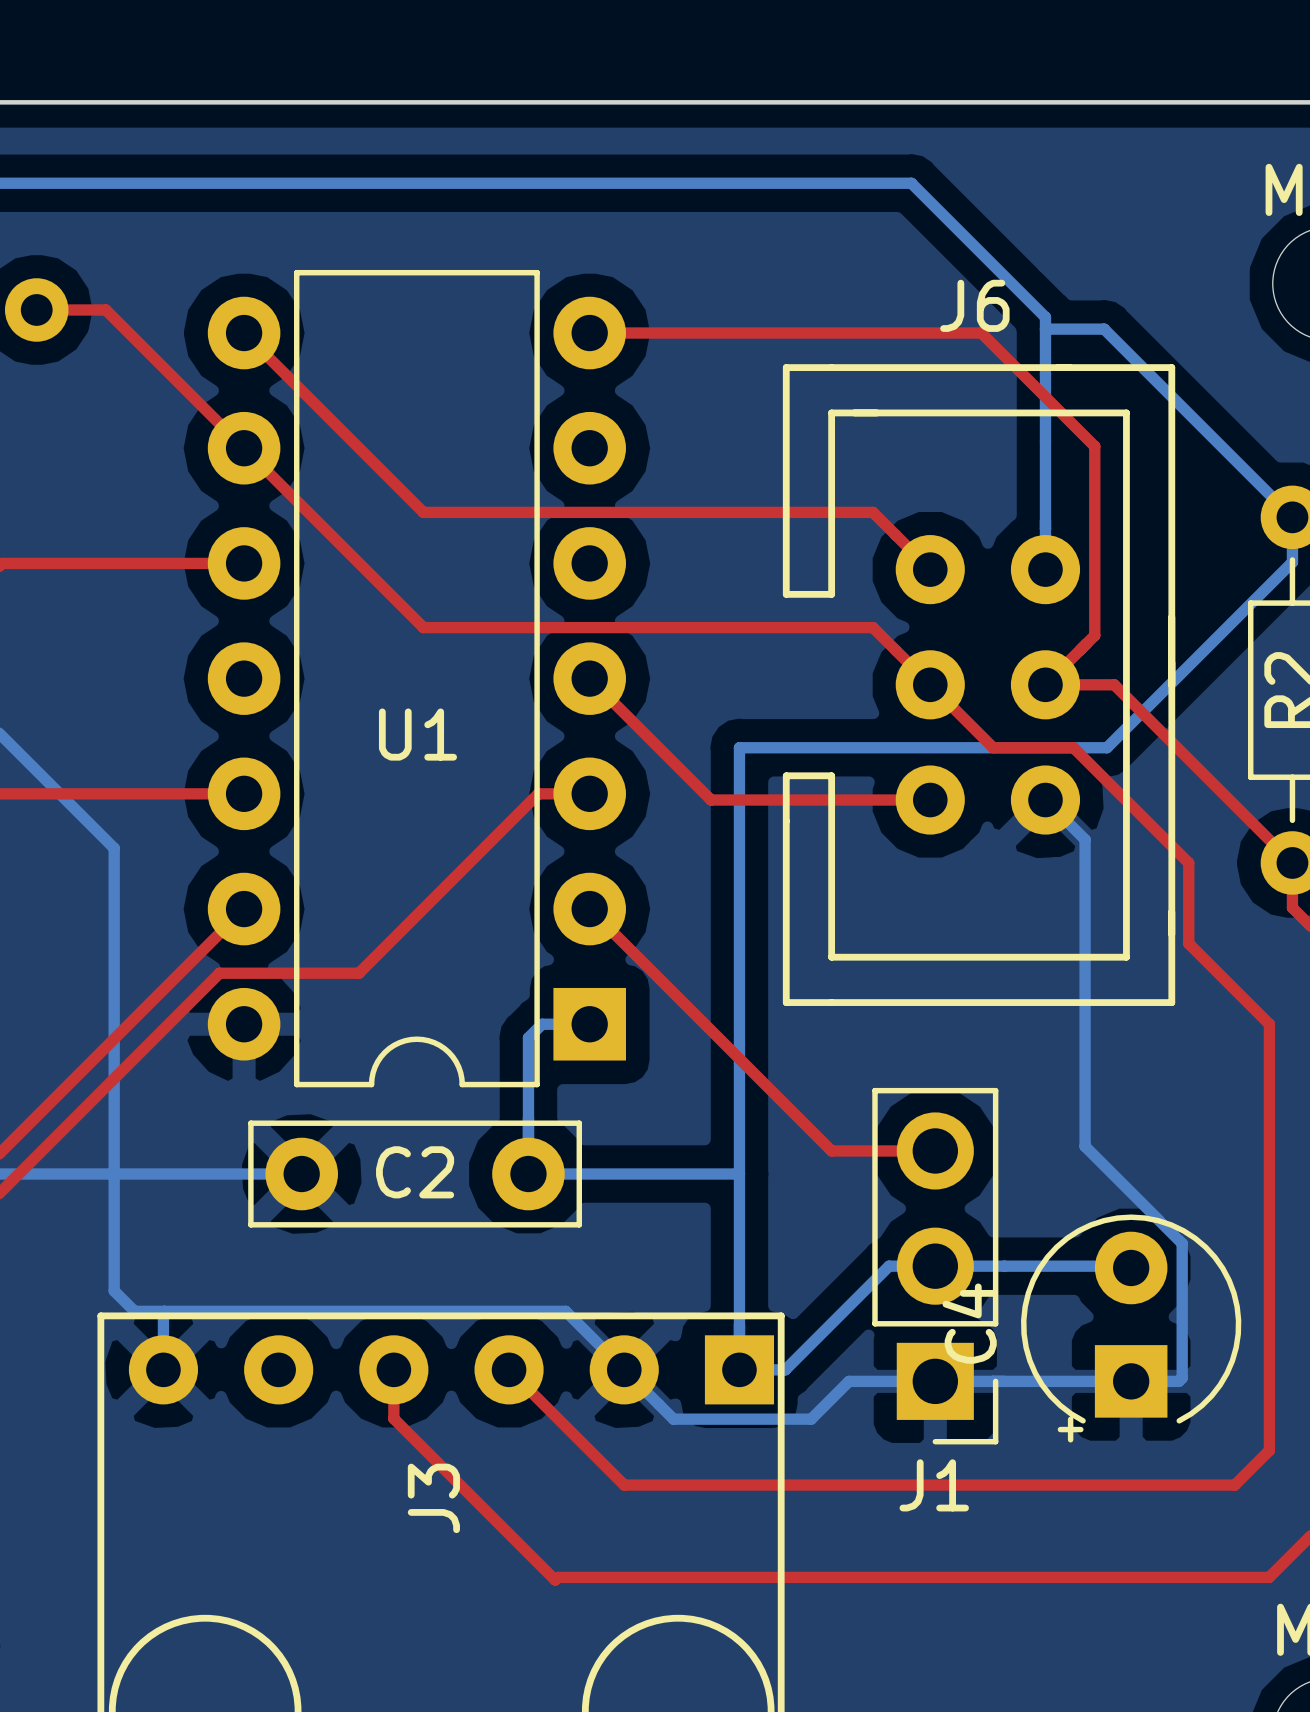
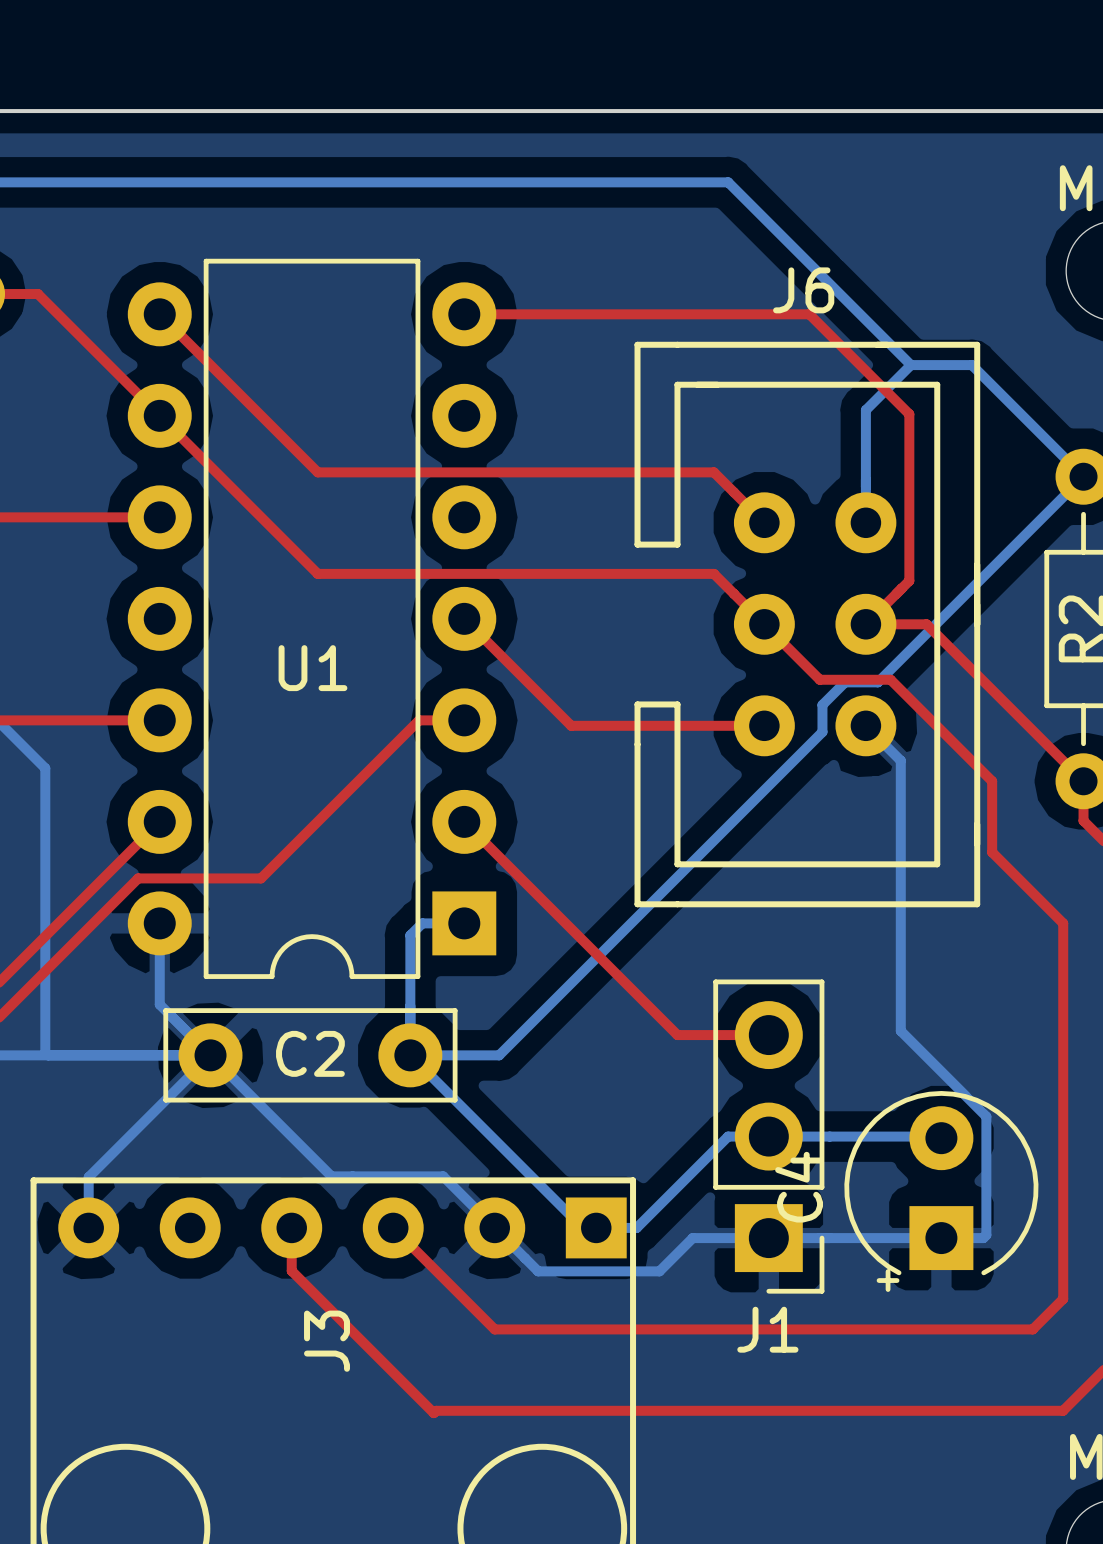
bottom track: (889, 183) (911, 183) (1045, 317) (1045, 441) -> (728, 182) (910, 365)
bottom track: (1045, 329) (1104, 329) (1165, 390) -> (910, 365) (971, 365)
bottom track: none -> (910, 365) (865, 410)
bottom track: (1292, 517) (1292, 562) (1106, 747) (739, 747) (739, 1369) -> (1083, 476) (877, 682) (845, 682) (822, 704) (822, 732) (499, 1055)
bottom track: (114, 1170) (114, 1290) (134, 1311) (439, 1311) -> (159, 923) (159, 1004) (331, 1176)
bottom track: none -> (210, 1055) (89, 1176)
bottom track: none -> (410, 1055) (582, 1227) (596, 1227)
bottom track: (629, 1174) (739, 1174) -> none

